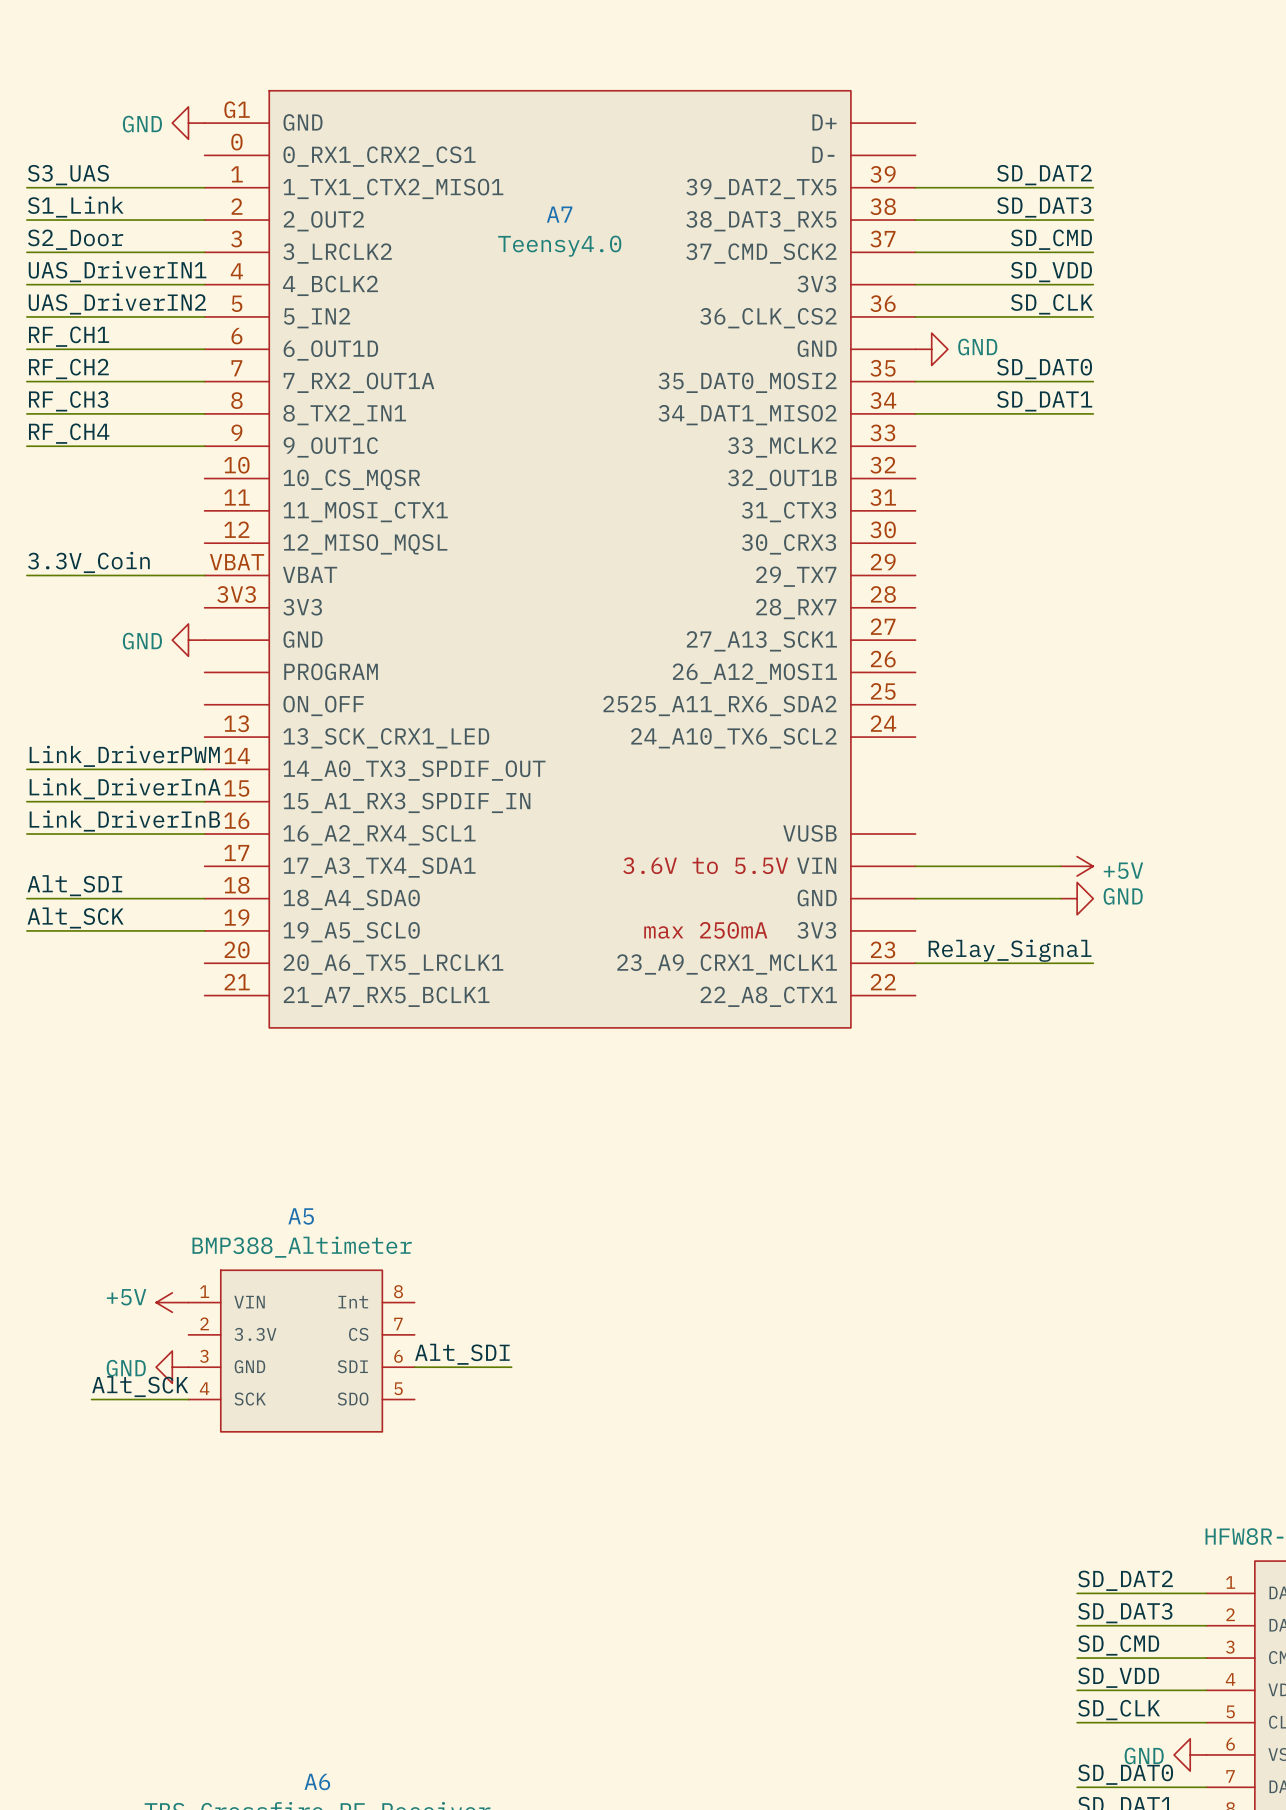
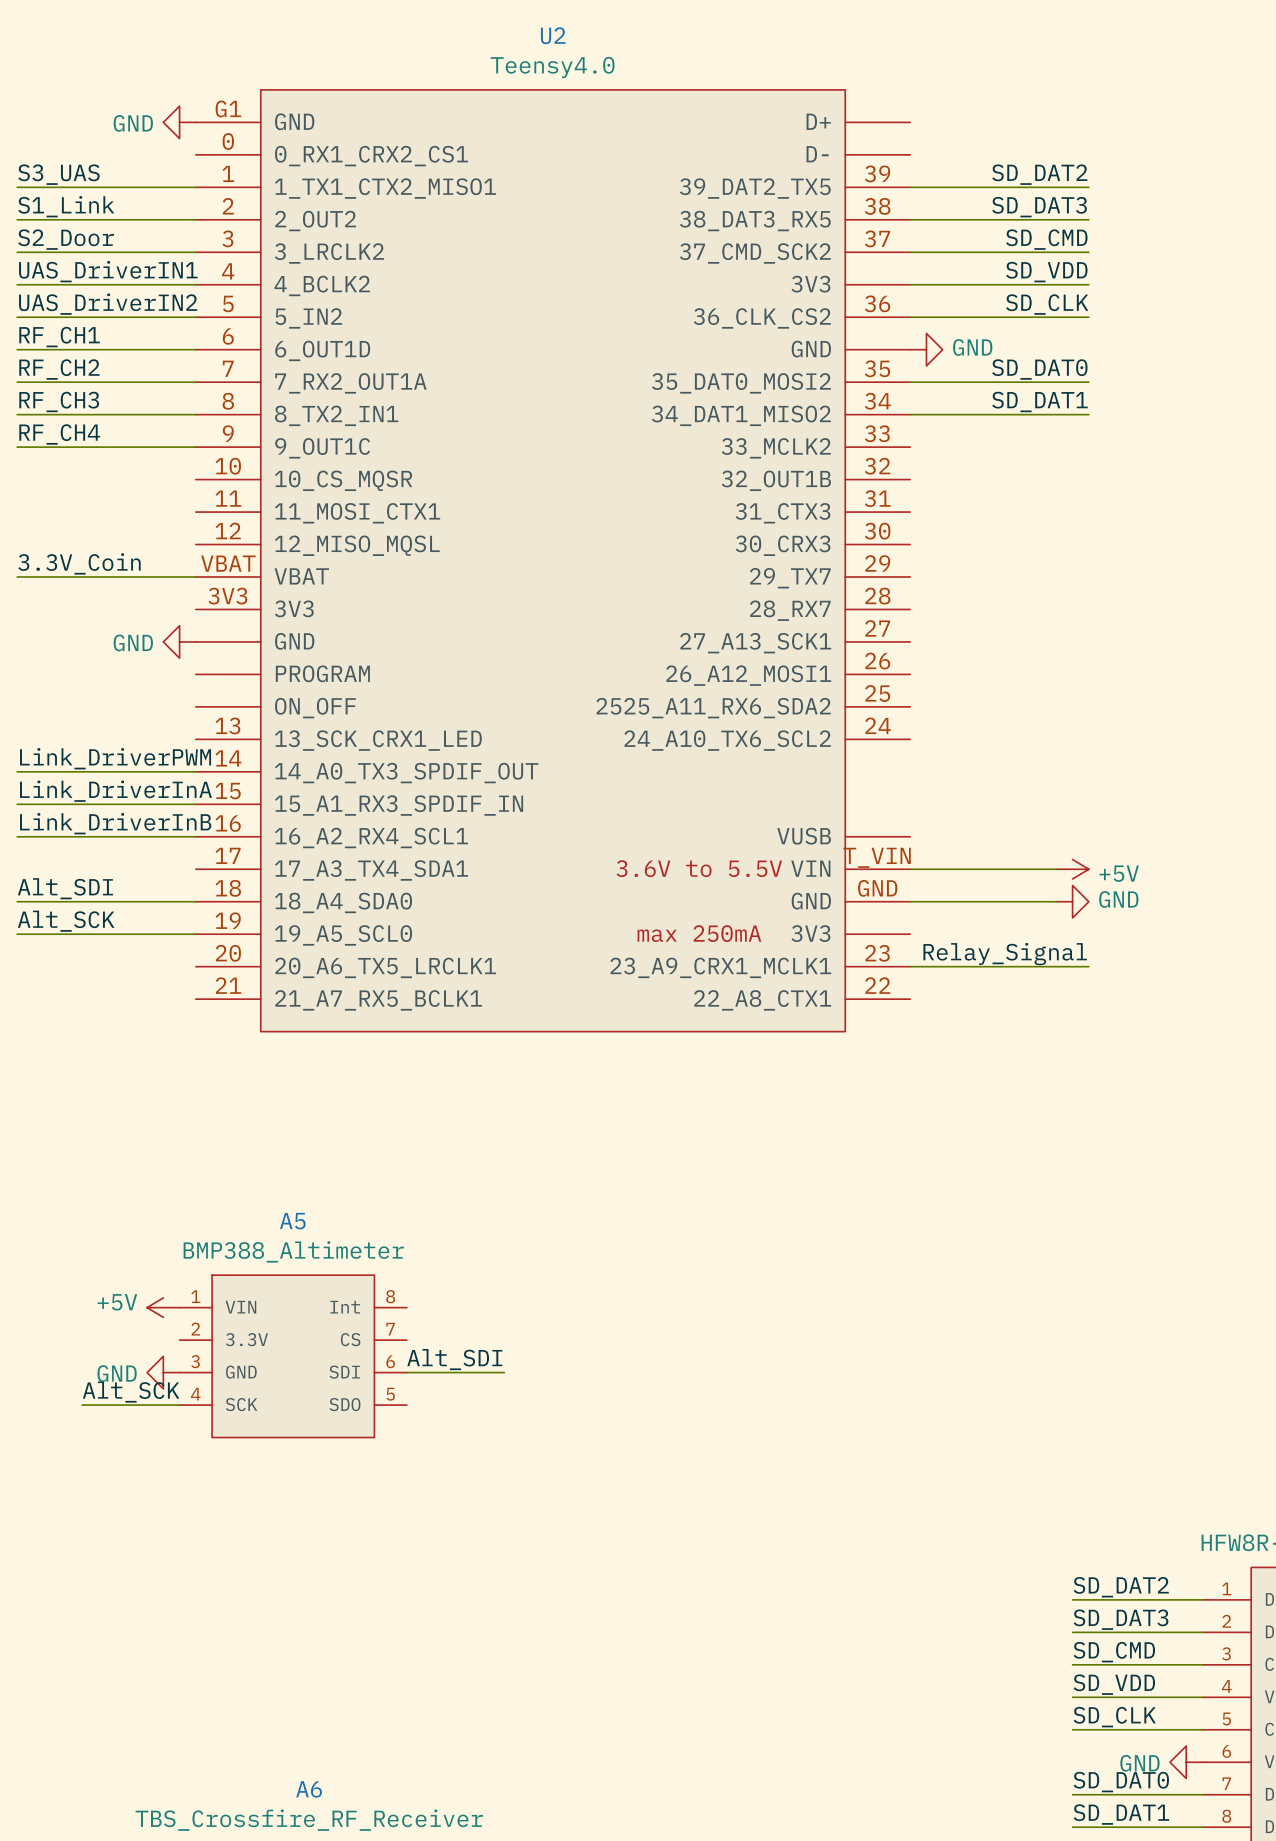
A7 name: A7 (559, 214) -> U2 (553, 35)
A7 value position: Teensy4.0 (559, 246) -> Teensy4.0 (552, 67)
A7 pin number: none -> T_VIN (877, 857)
A7 pin number: none -> GND (877, 888)

